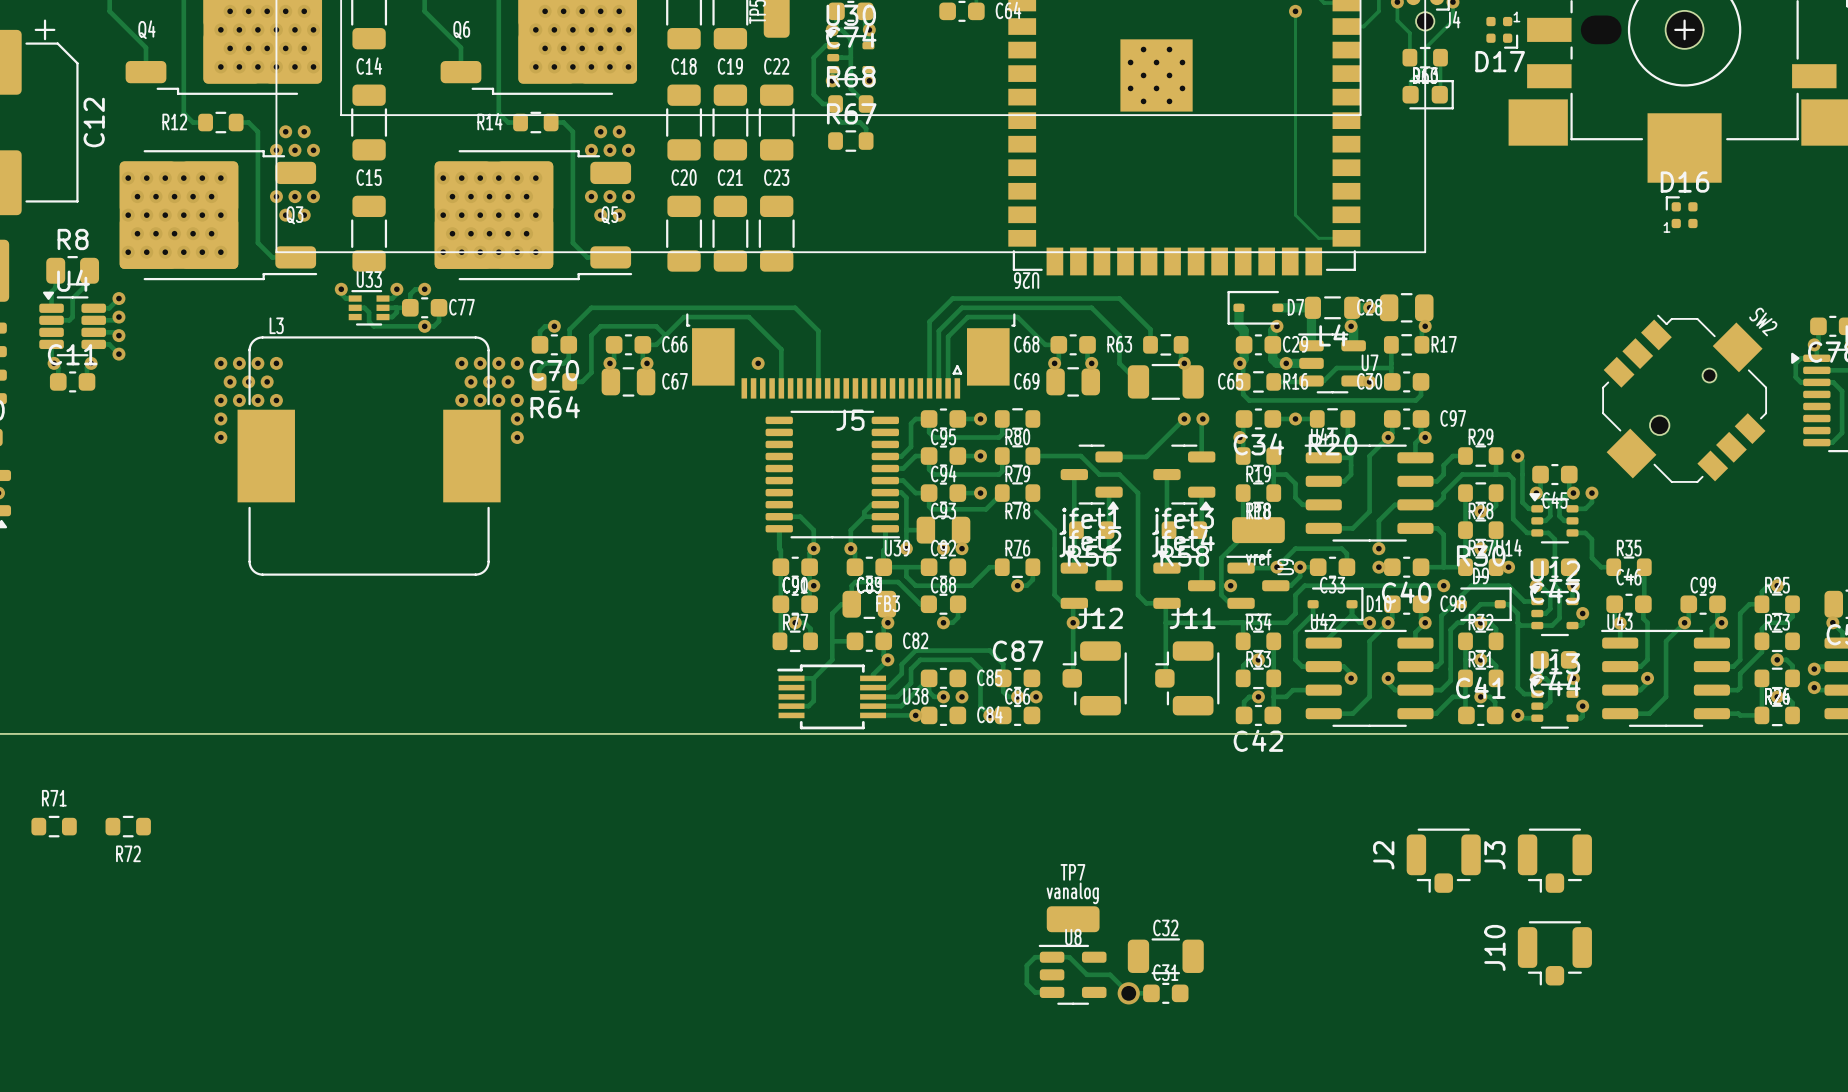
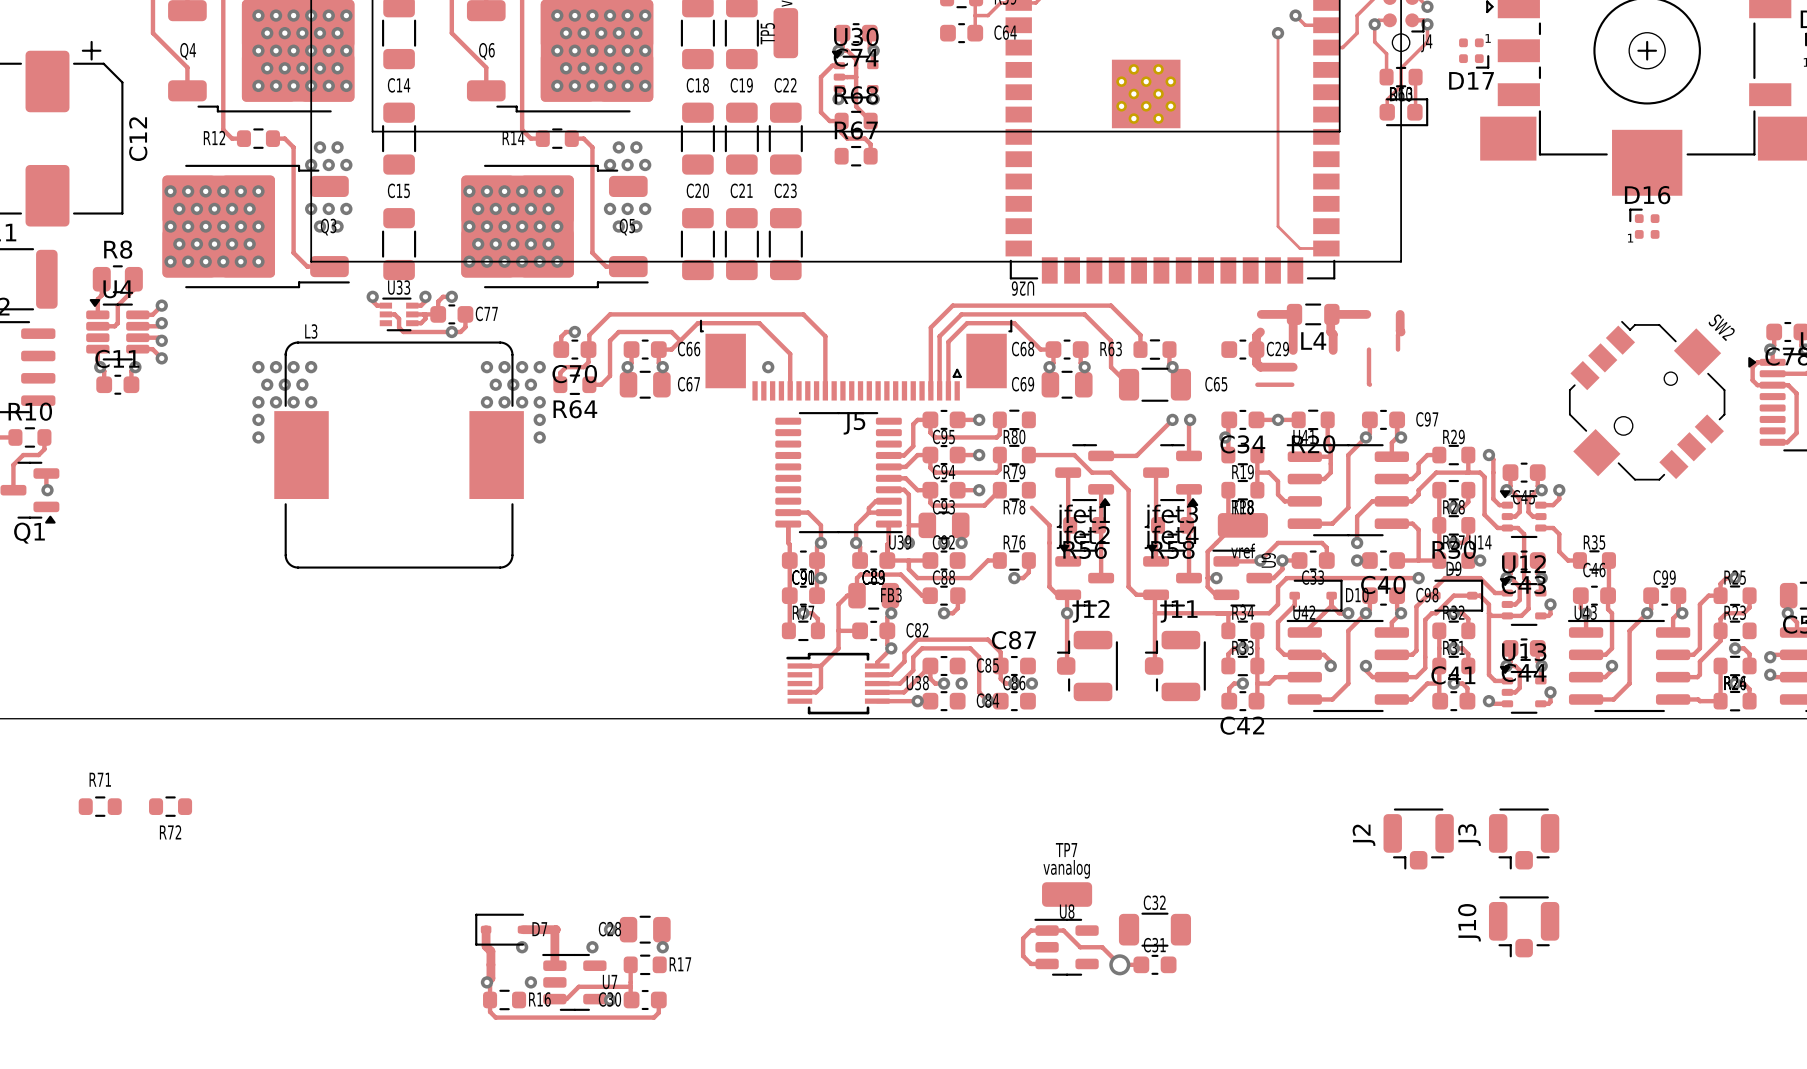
track: (1238, 307) (1238, 325) (1244, 330) (1244, 359) (1239, 363) (1243, 366) (1243, 394) (1249, 400) (1415, 400) (1421, 395) (1421, 381) -> none
D7 position: (1255, 307) -> (501, 929)
via: (1369, 307) -> none
C28 position: (1406, 307) -> (645, 929)
via: (1276, 326) -> none
via: (1351, 326) -> none
via: (1425, 326) -> none
R17 position: (1406, 344) -> (645, 964)
via: (1239, 363) -> none
via: (1286, 363) -> none
U7 position: (1332, 363) -> (574, 982)
track: (1391, 368) (1336, 368) (1323, 380) (1311, 380) -> none
R16 position: (1258, 381) -> (504, 999)
via: (1369, 381) -> none
C30 position: (1406, 381) -> (645, 999)
track: none -> (486, 929) (486, 946) (490, 951) (490, 978) (486, 982) (490, 985) (490, 1011) (495, 1017) (653, 1017) (658, 1012) (658, 999)
track: none -> (523, 929) (556, 929) (554, 965)
via: none -> (610, 929)
via: none -> (522, 947)
via: none -> (592, 947)
via: none -> (662, 947)
track: none -> (630, 964) (631, 999)
via: none -> (486, 982)
via: none -> (530, 982)
track: none -> (630, 986) (578, 986) (566, 999) (554, 999)
via: none -> (610, 999)

